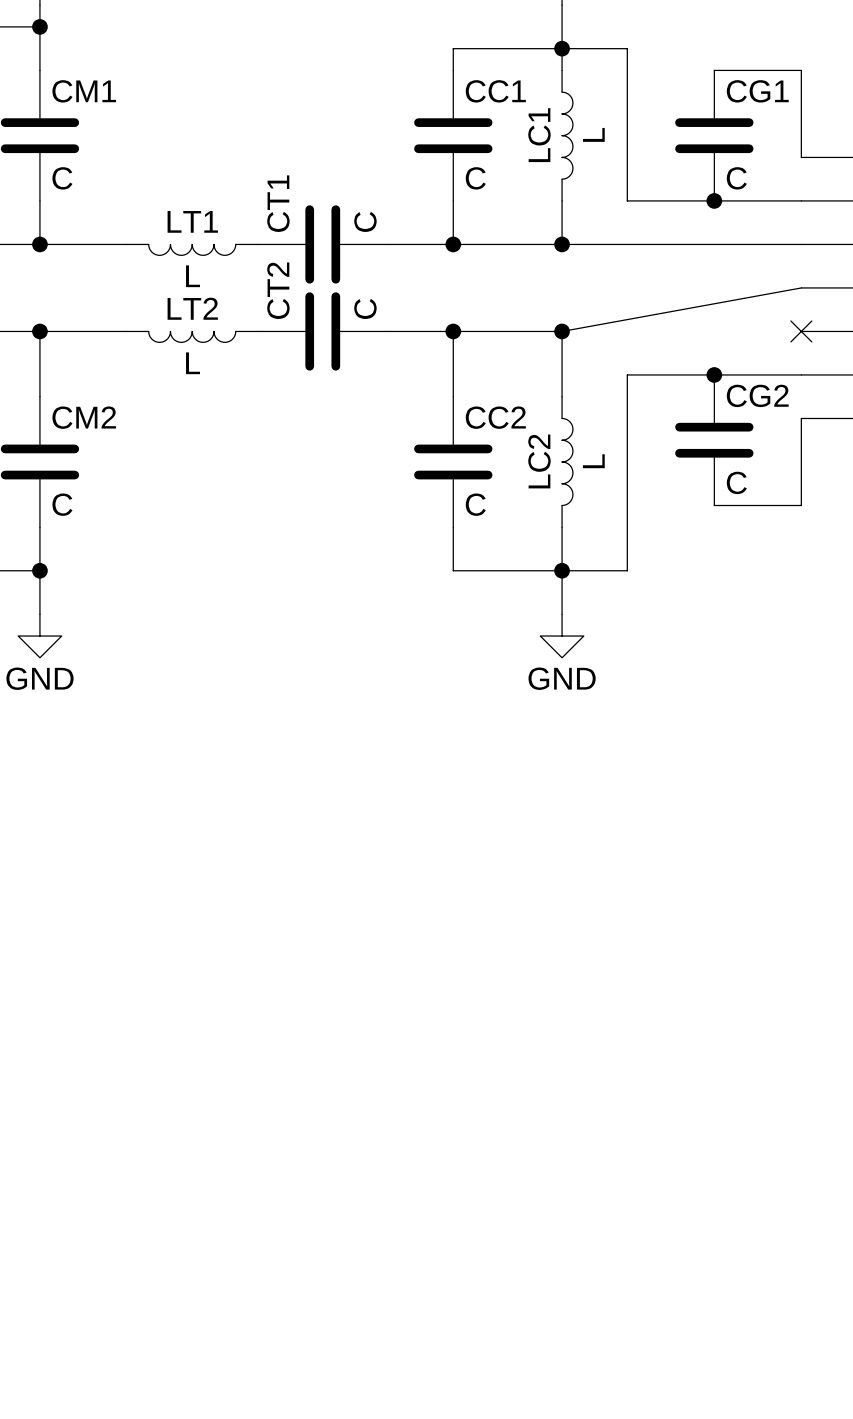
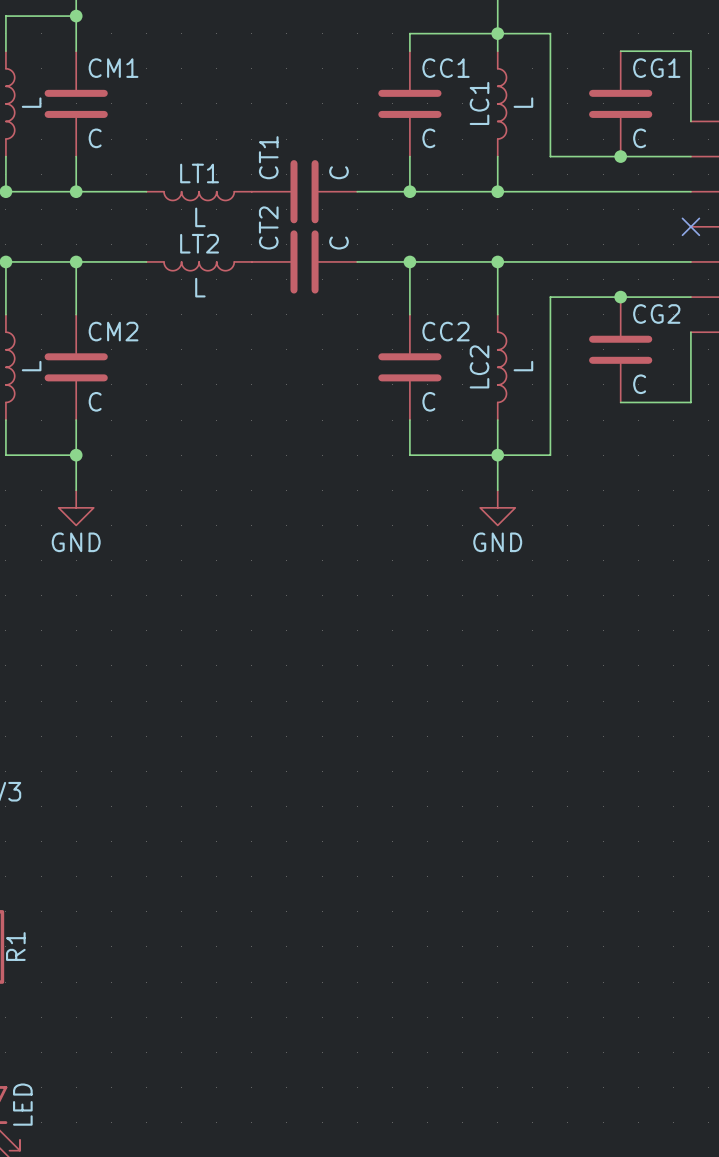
wire: (801, 287) (562, 331) -> (690, 261) (497, 261)
no-connect mark position: (801, 331) -> (690, 226)

